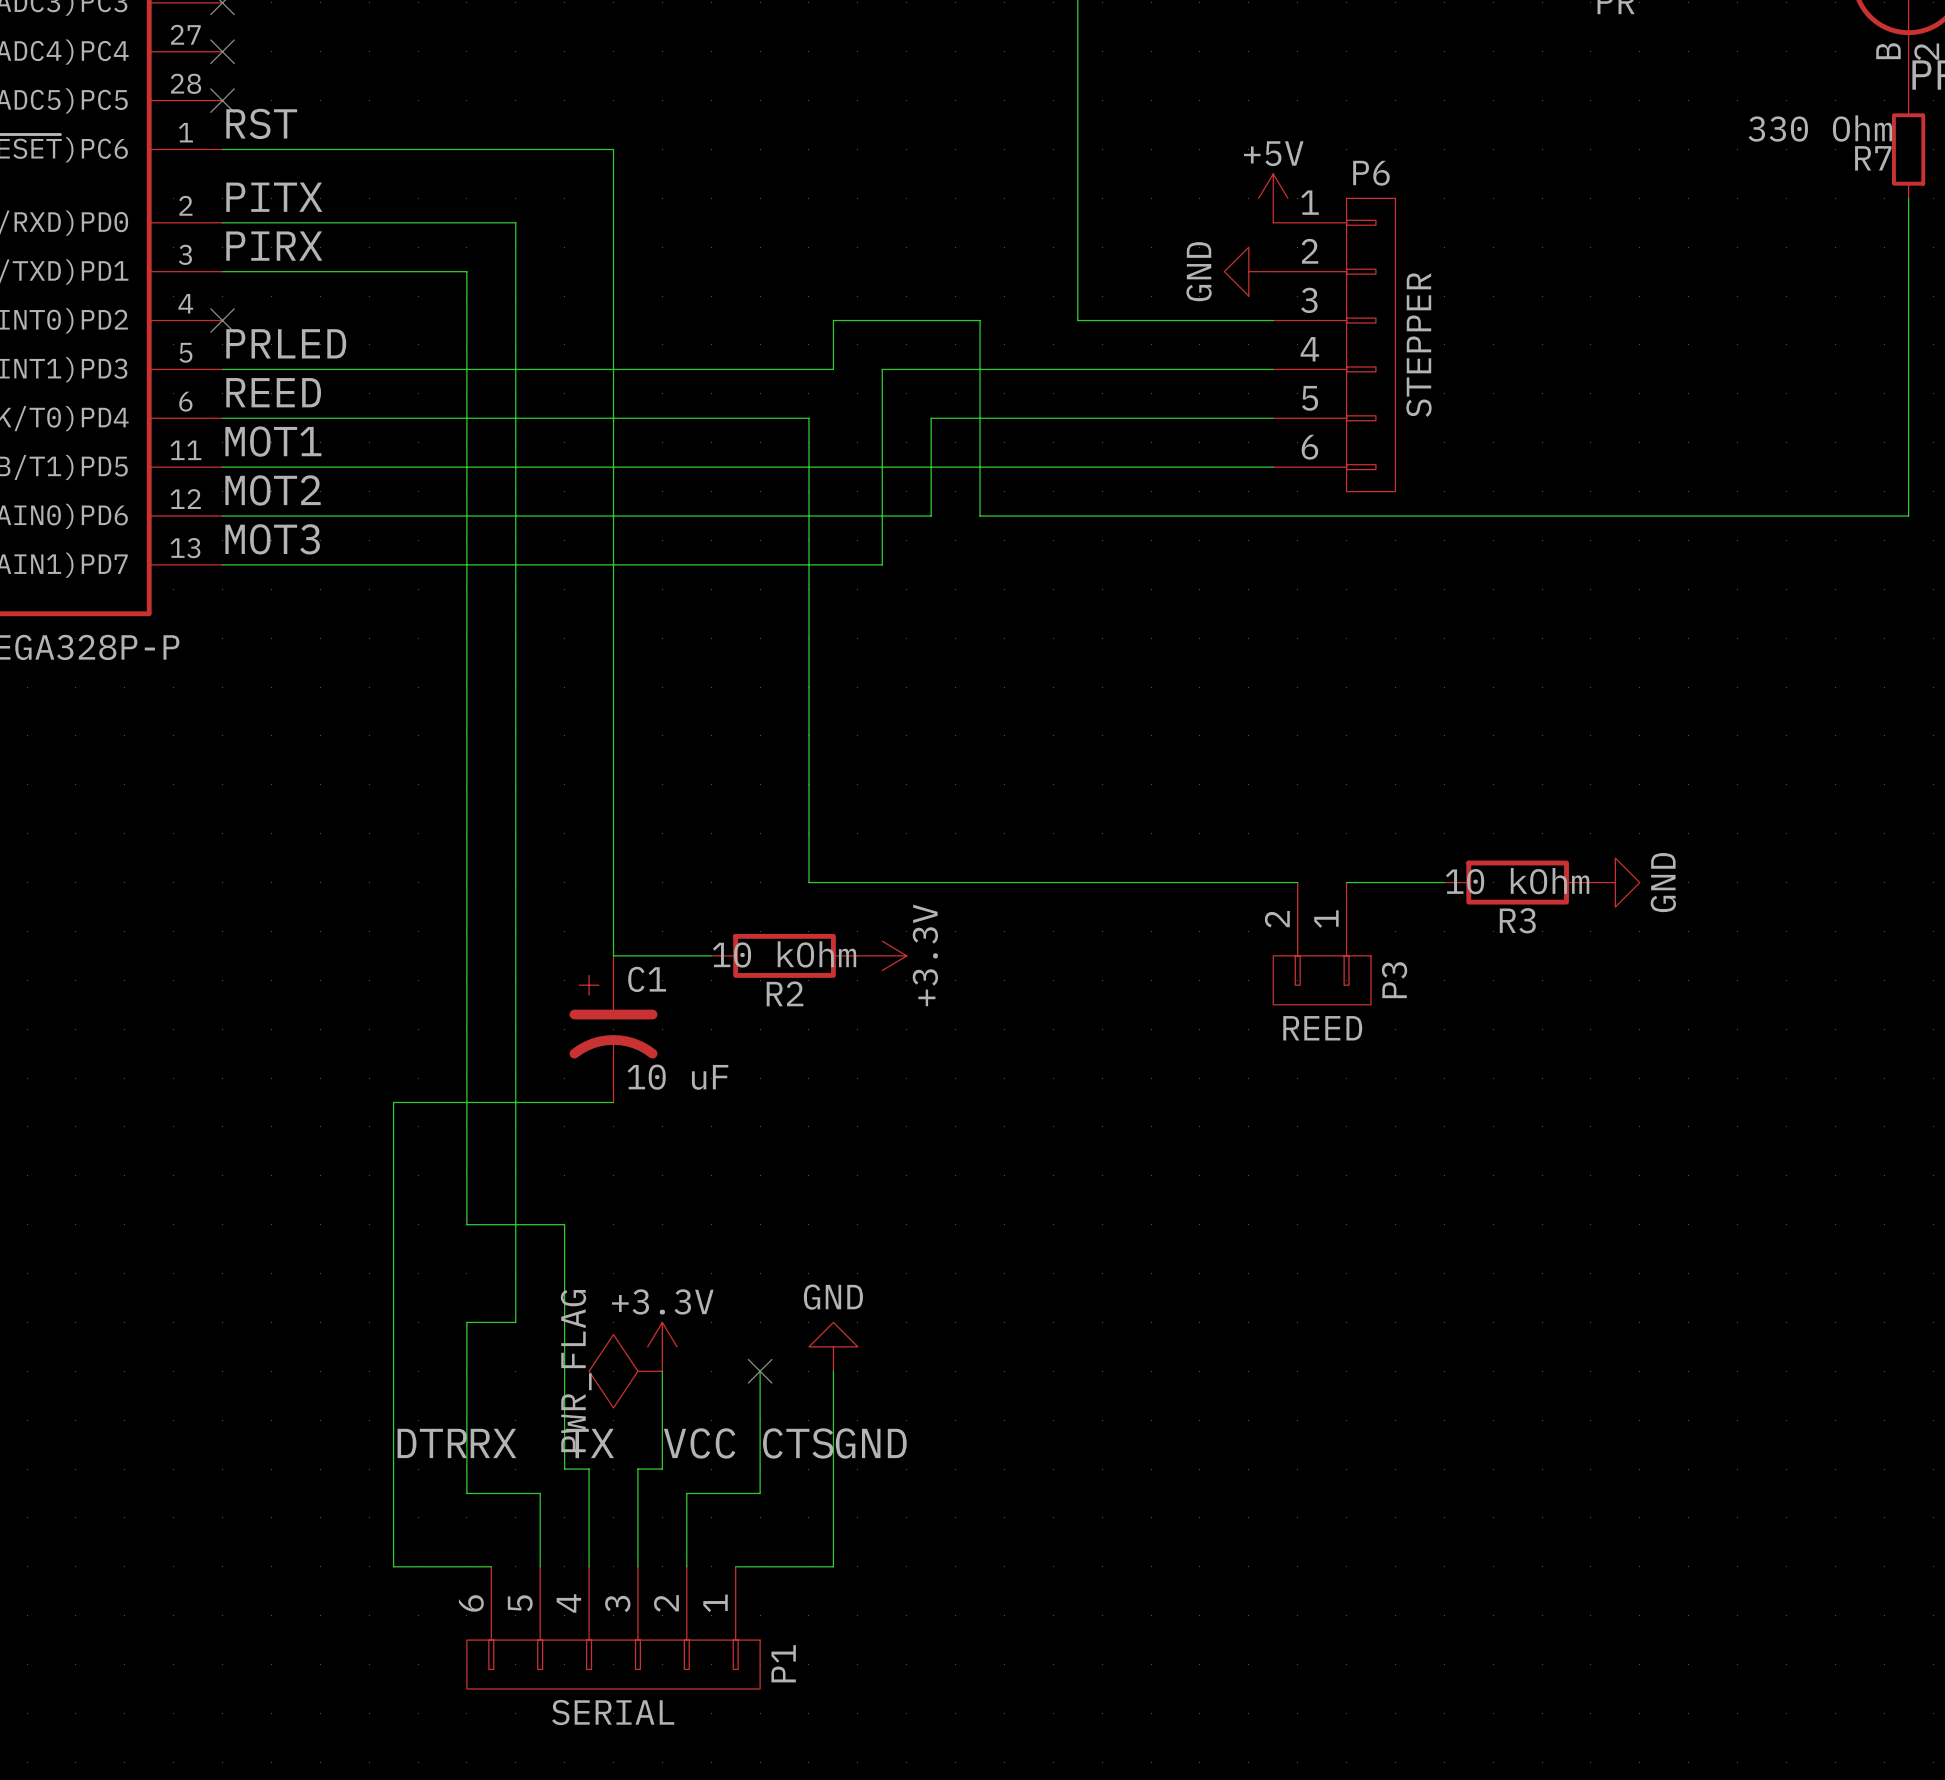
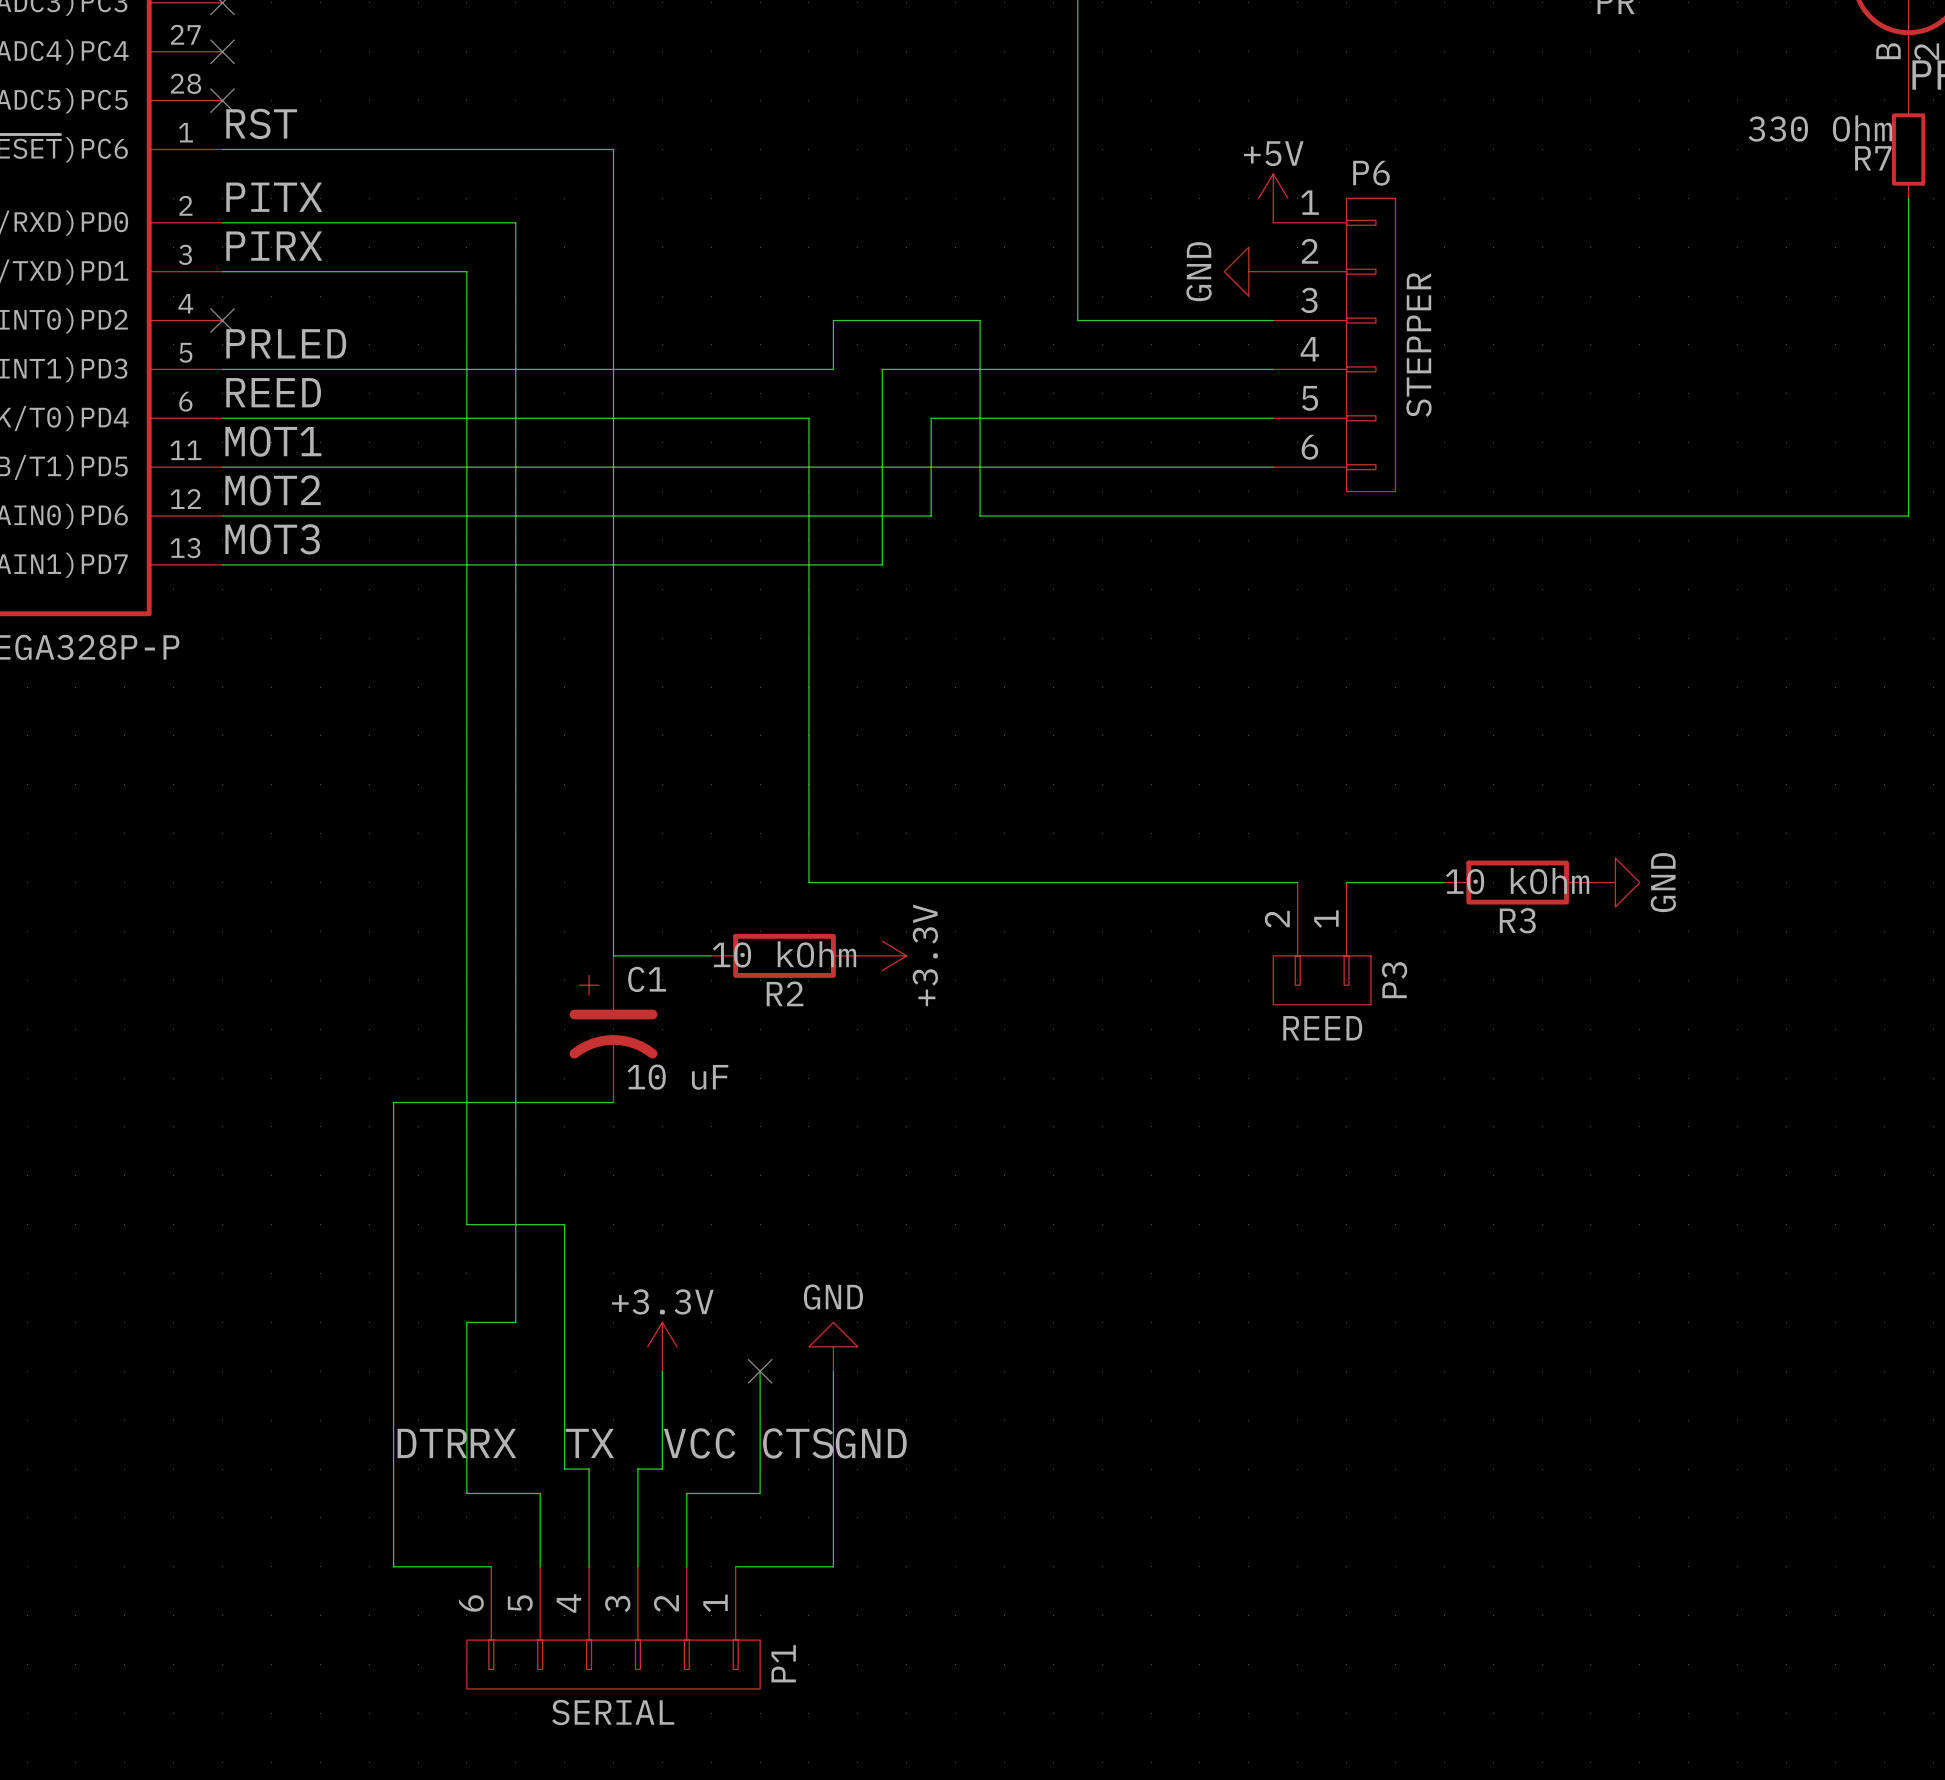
power symbol: PWR_FLAG (625, 1371) -> none

